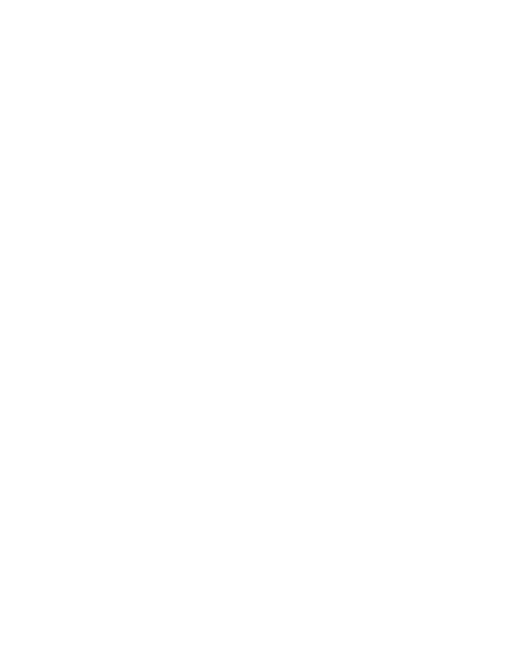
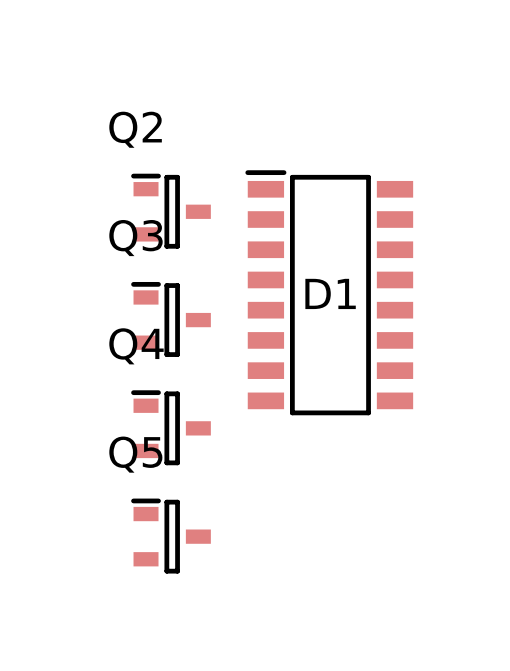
Q2: none -> (171, 211)
D1: none -> (329, 292)
Q3: none -> (171, 319)
Q4: none -> (171, 427)
Q5: none -> (171, 536)

